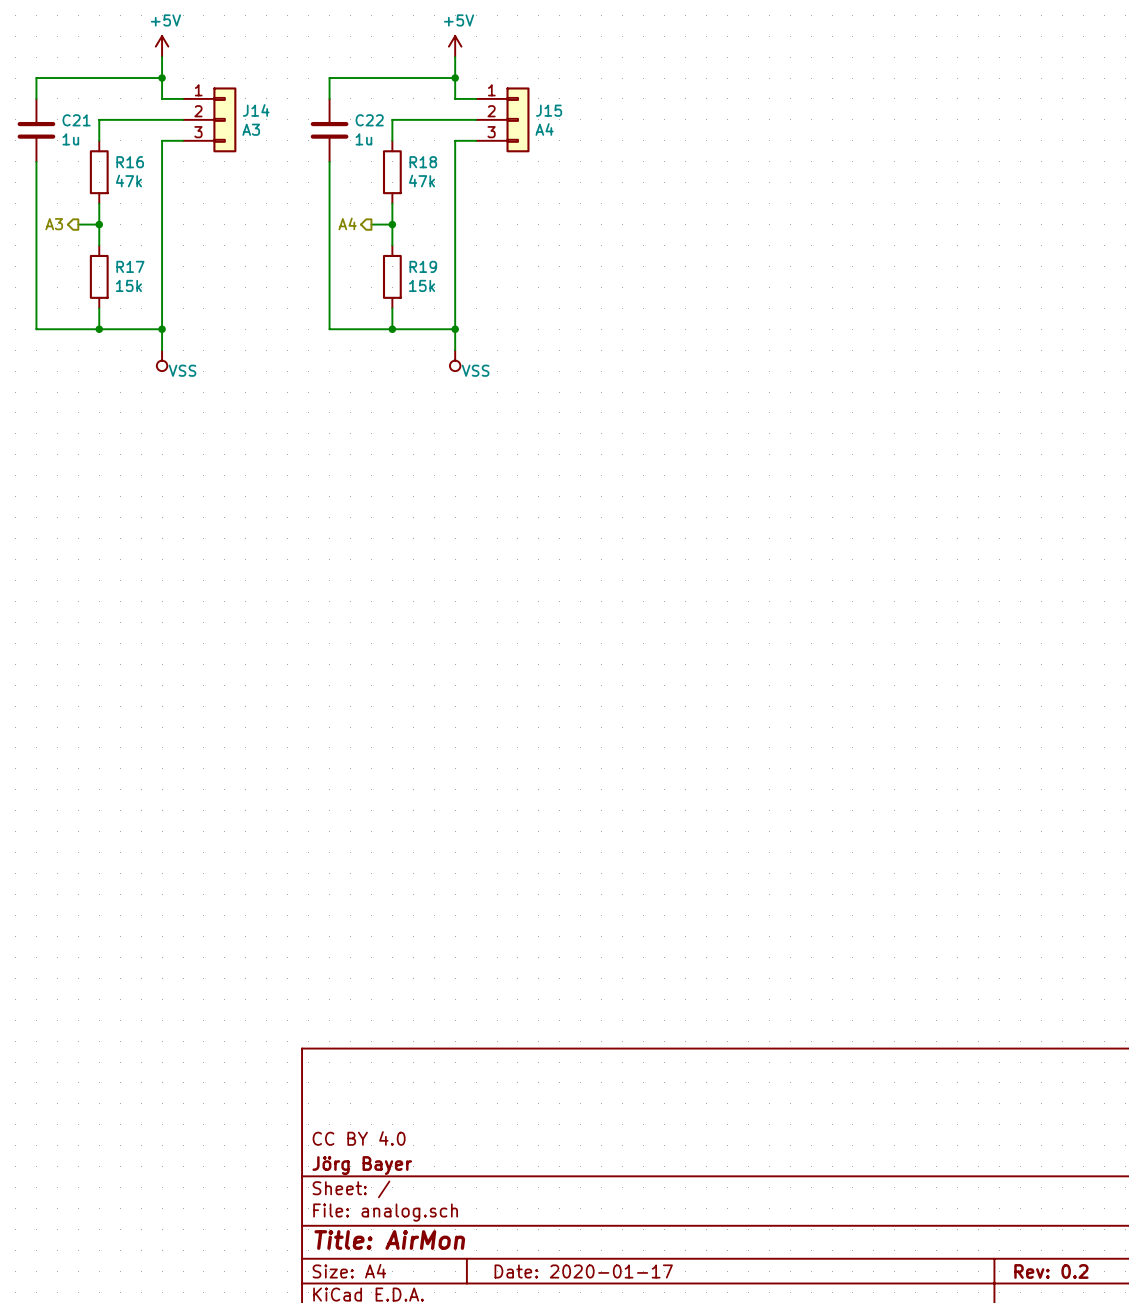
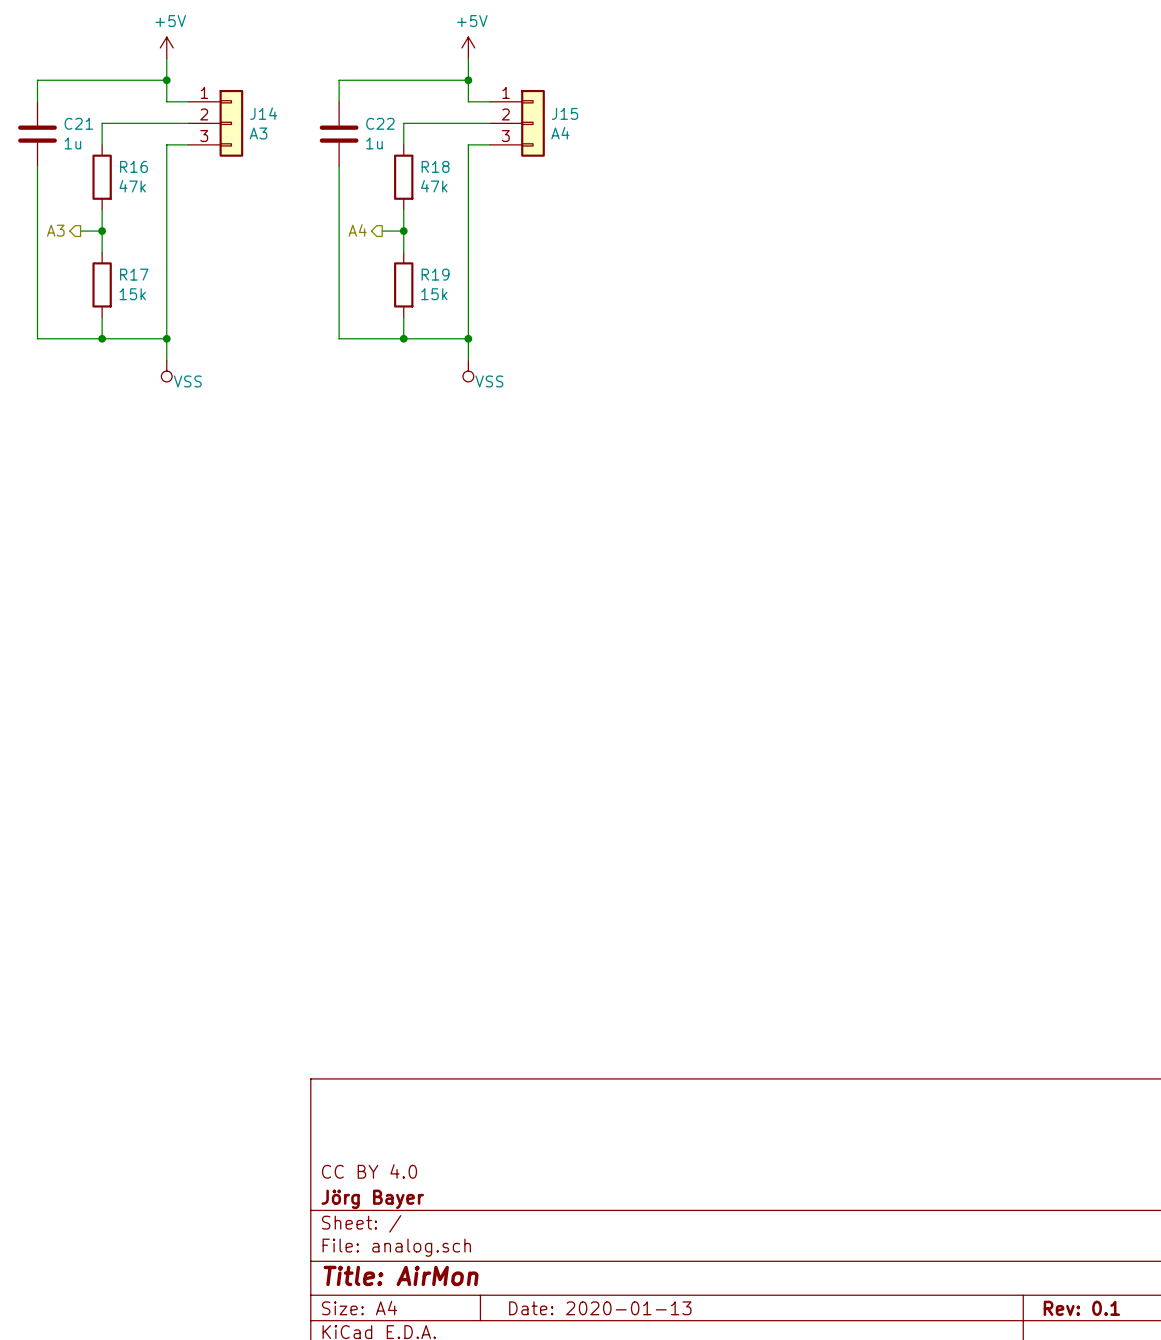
title block: Date: 2020-01-17 (583, 1271) -> Date: 2020-01-13 (600, 1308)
title block: Rev: 0.2 (1051, 1271) -> Rev: 0.1 (1081, 1308)

